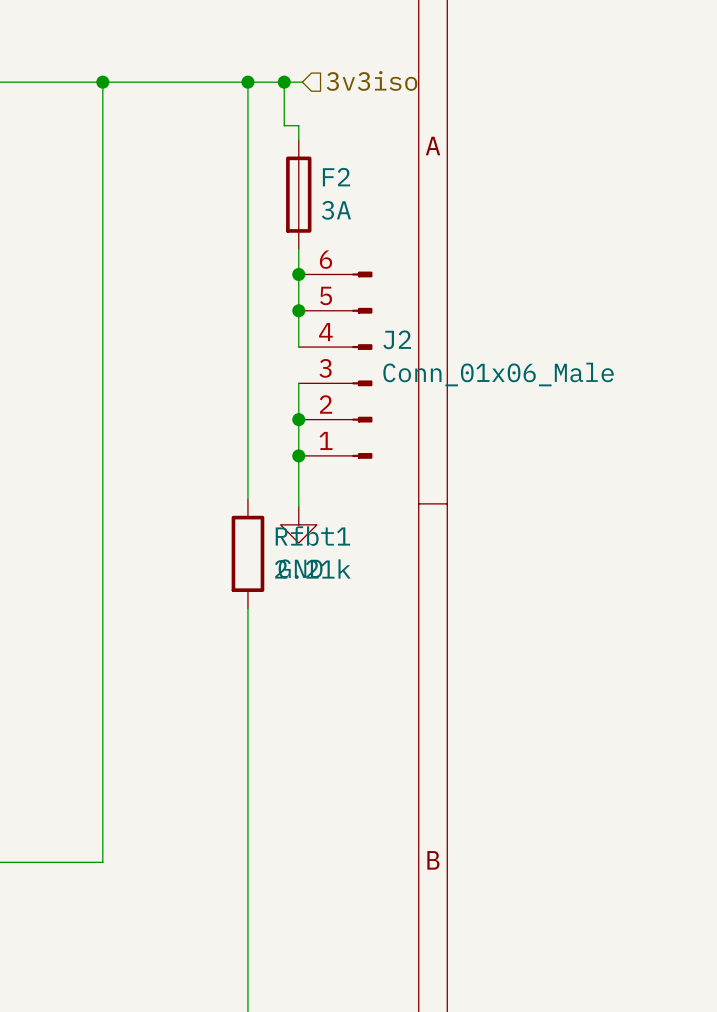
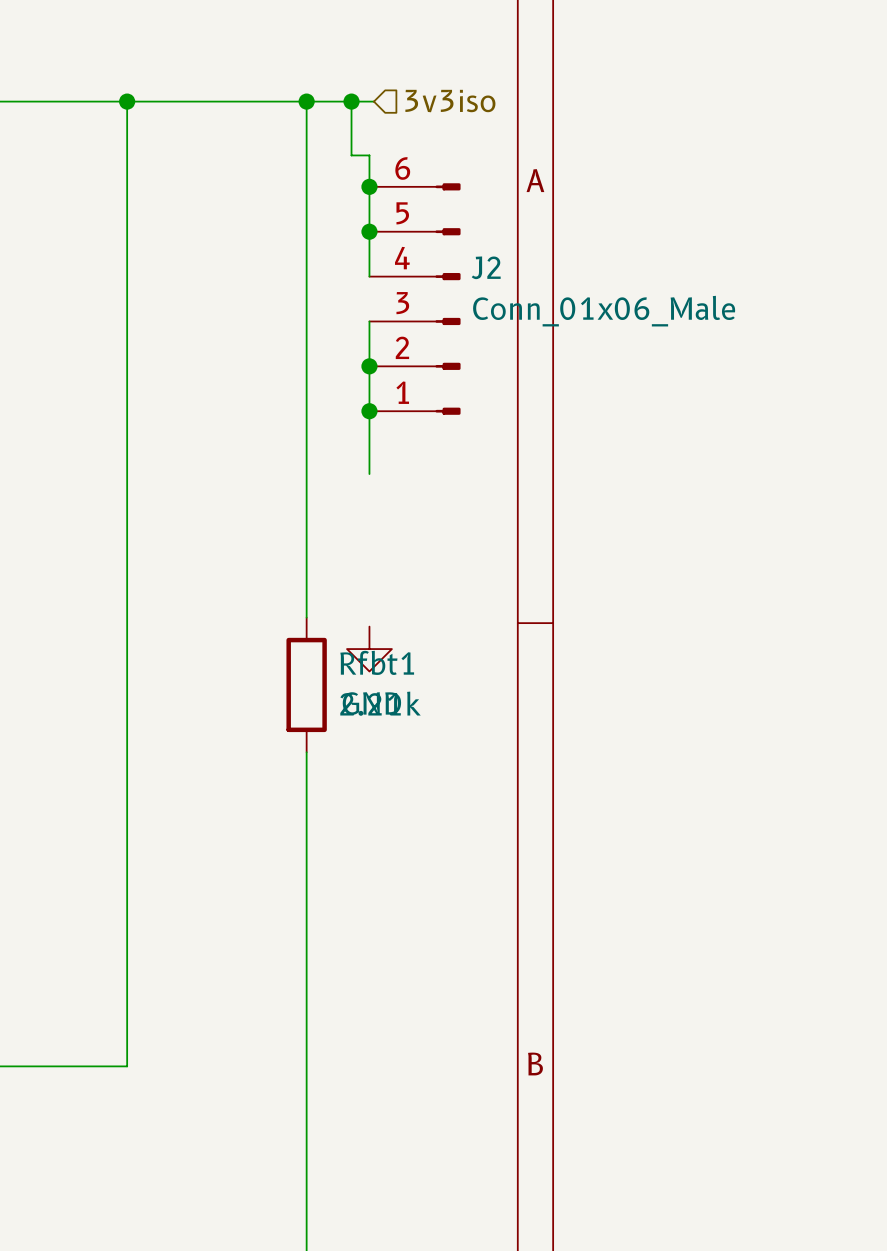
junction: none -> (369, 186)
junction: none -> (369, 231)
F2: 3A (298, 194) -> none
wire: (298, 249) (298, 259) -> none
junction: (298, 274) -> none
junction: none -> (369, 366)
junction: (298, 310) -> none
junction: none -> (369, 411)
J2 position: (335, 365) -> (415, 299)
wire: (298, 383) (298, 506) -> (369, 474) (369, 429)
junction: (298, 419) -> none
junction: (298, 455) -> none

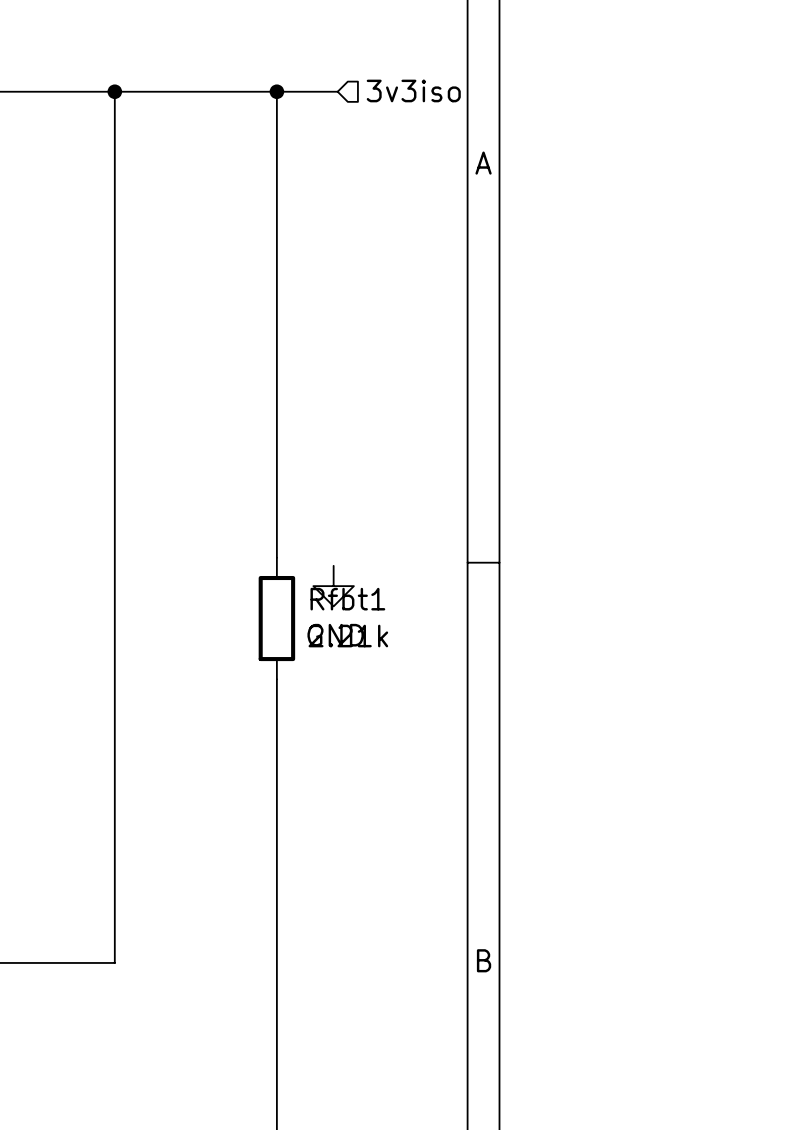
wire: (351, 101) (351, 155) (369, 155) (369, 276) -> none
junction: (351, 101) -> none
junction: (369, 186) -> none
junction: (369, 231) -> none
J2: Conn_01x06_Male (415, 299) -> none
wire: (369, 321) (369, 474) -> none
junction: (369, 366) -> none
junction: (369, 411) -> none

